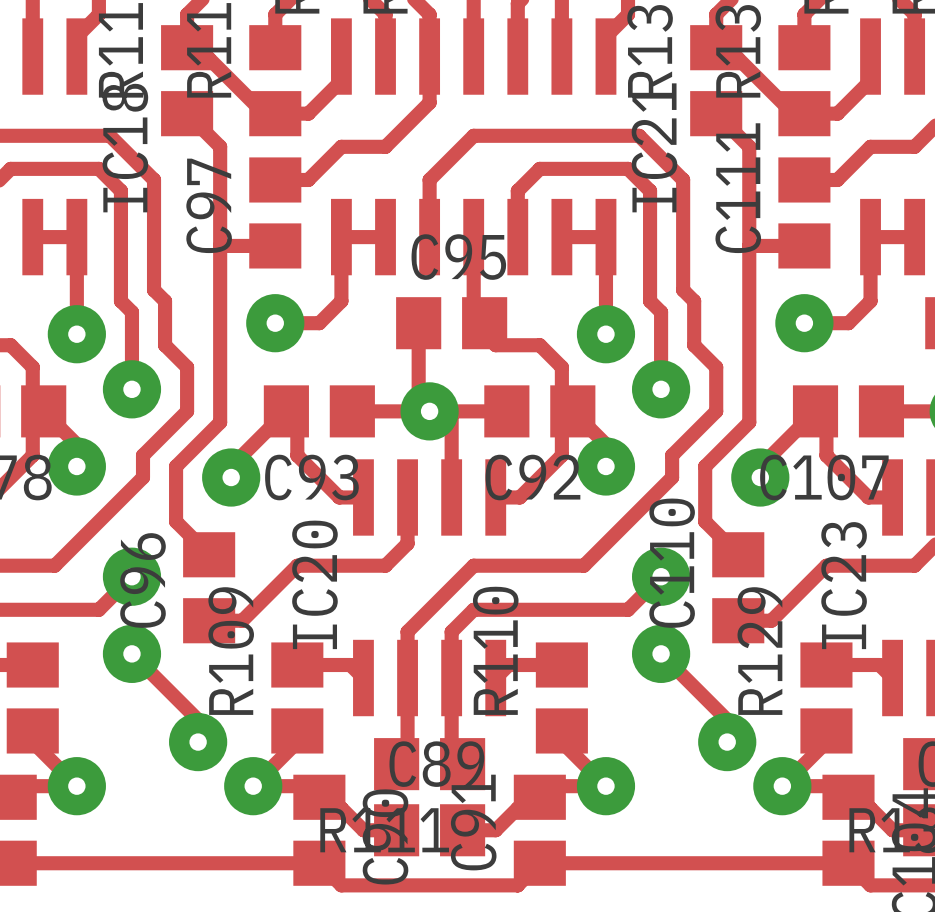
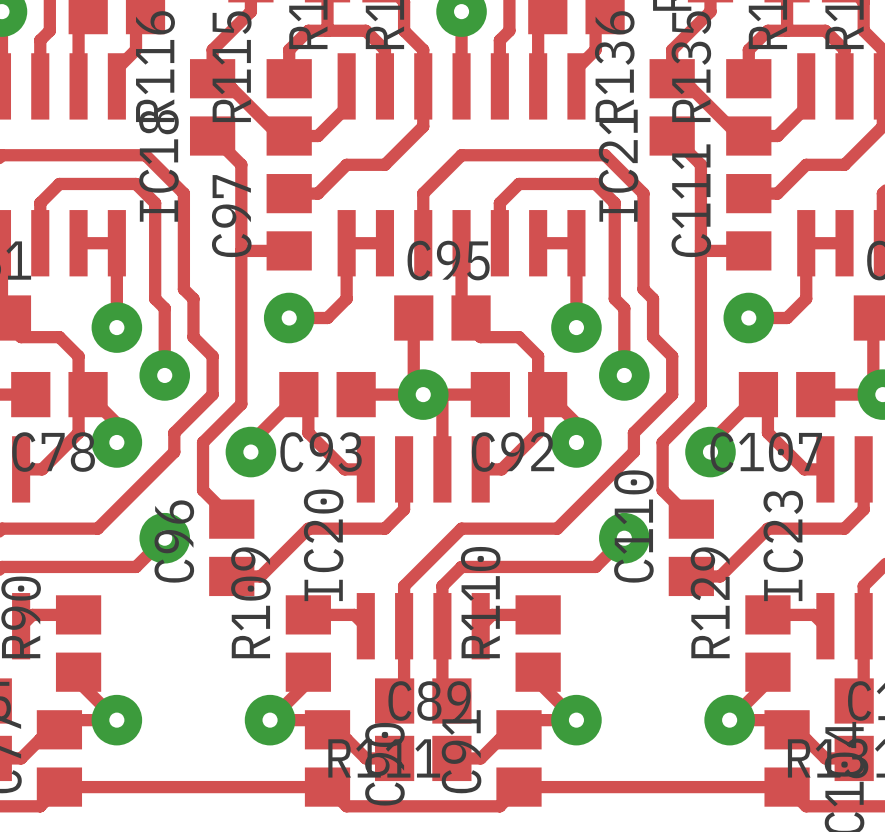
track: (131, 653) (198, 720) (198, 742) -> none
via: (131, 653) -> none
track: (661, 653) (727, 720) (727, 742) -> none
via: (661, 653) -> none
via: (198, 742) -> none
via: (727, 742) -> none

